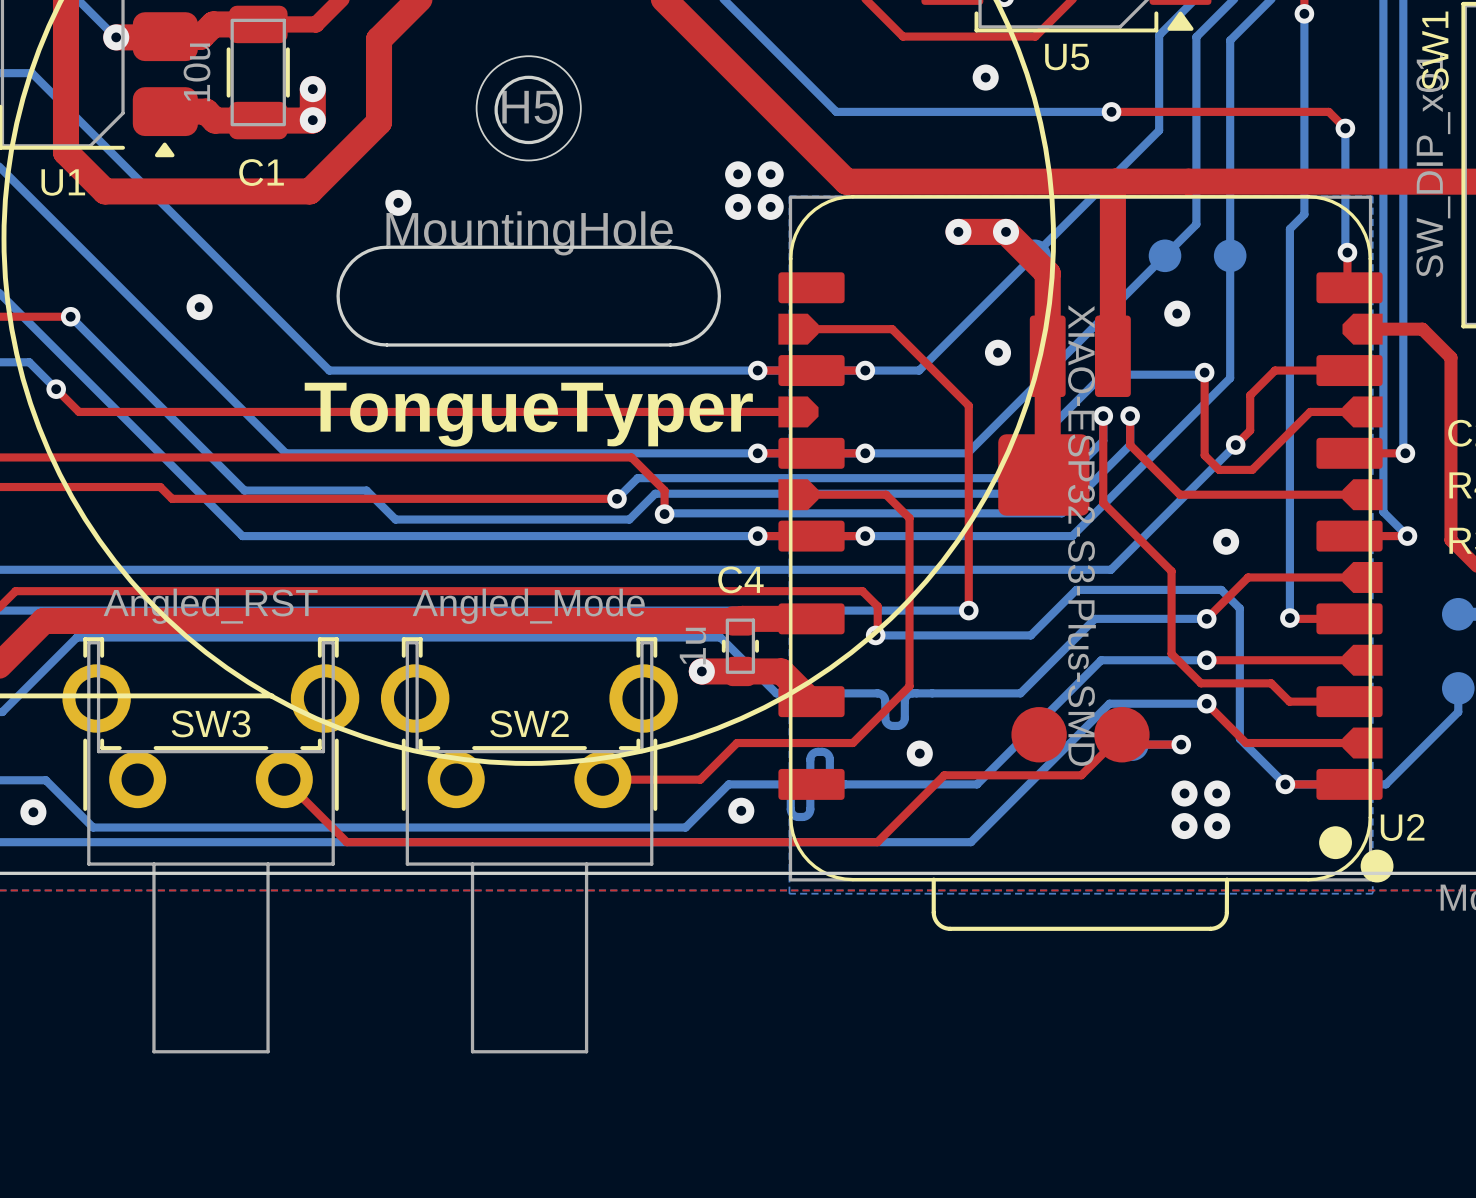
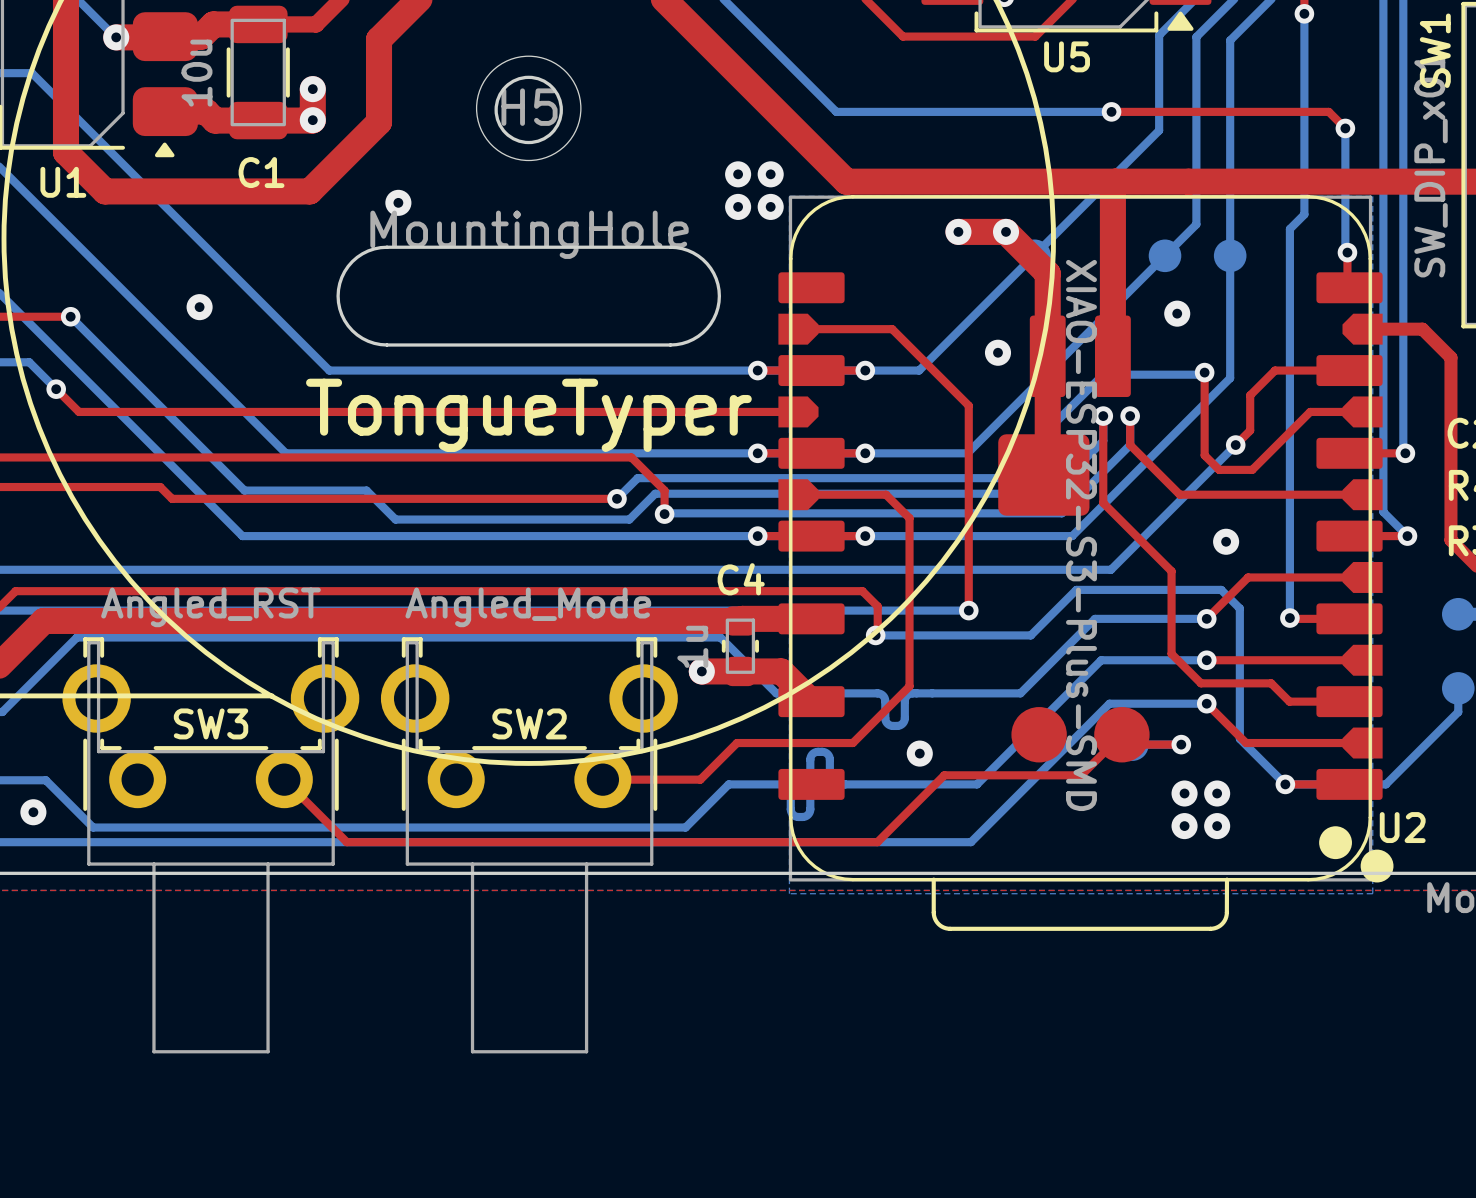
via: (985, 77) -> none
via: (741, 810) -> none

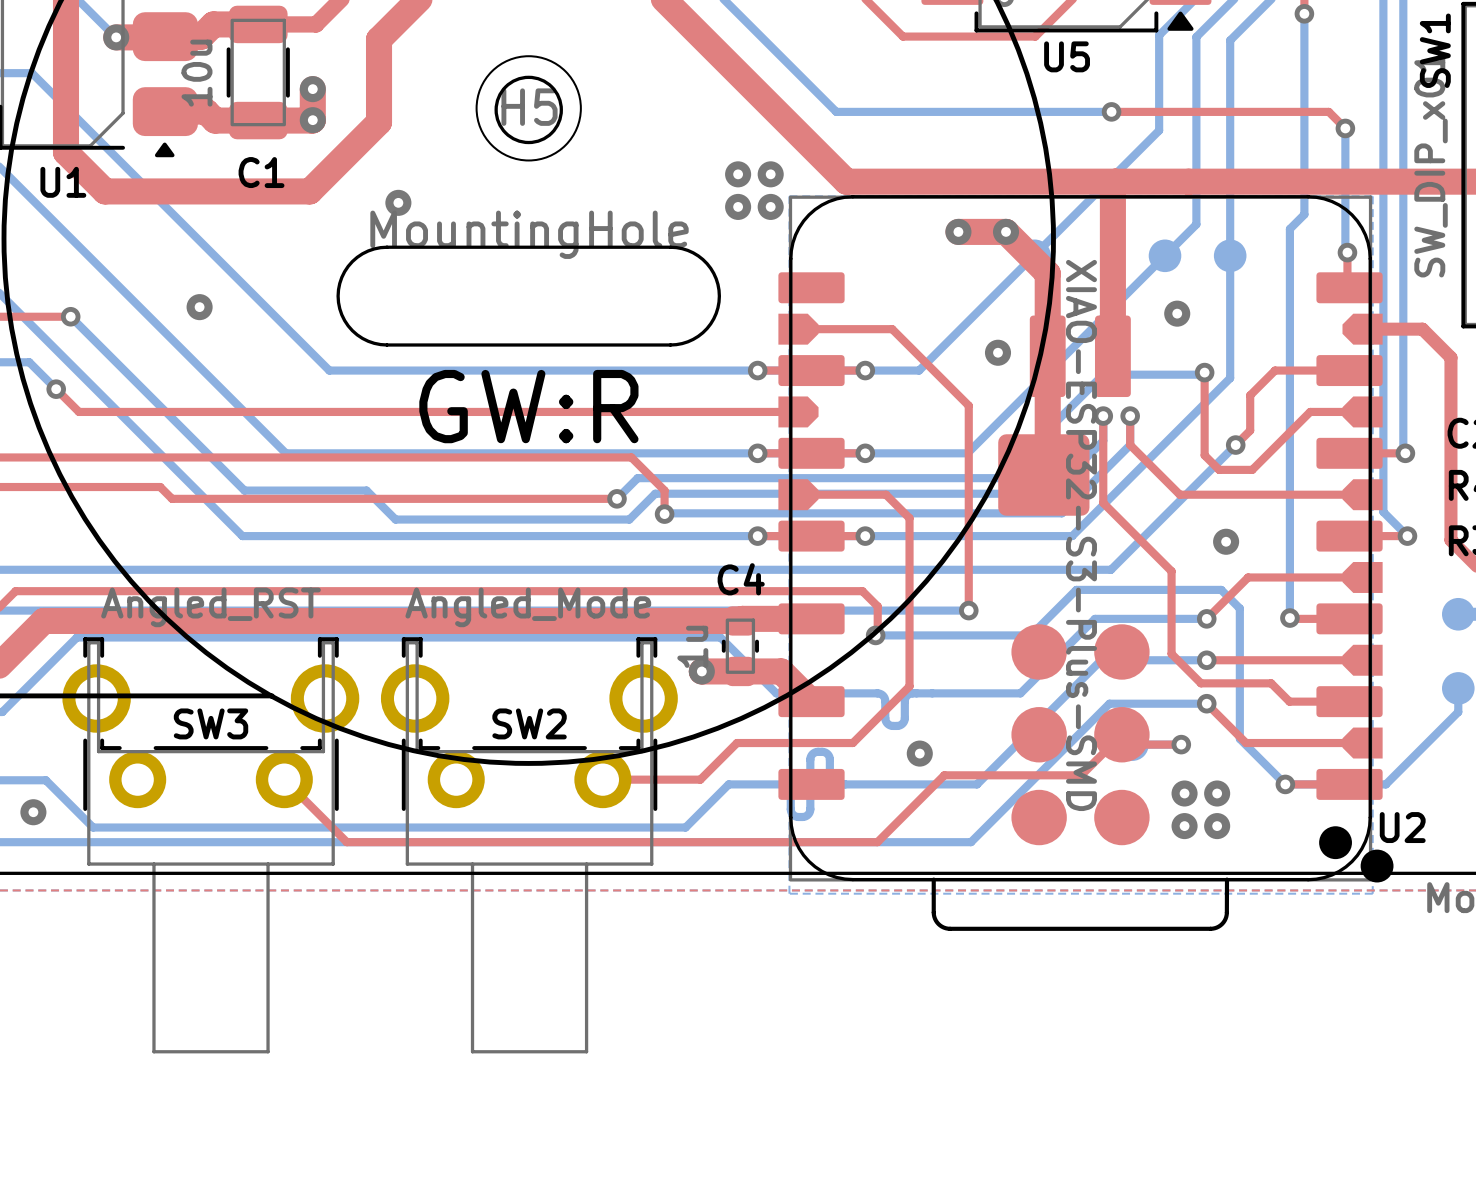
U2 footprint: [778, 195, 1394, 931] -> [778, 195, 1394, 931]
text: TongueTyper (528, 415) -> GW:R (528, 406)

